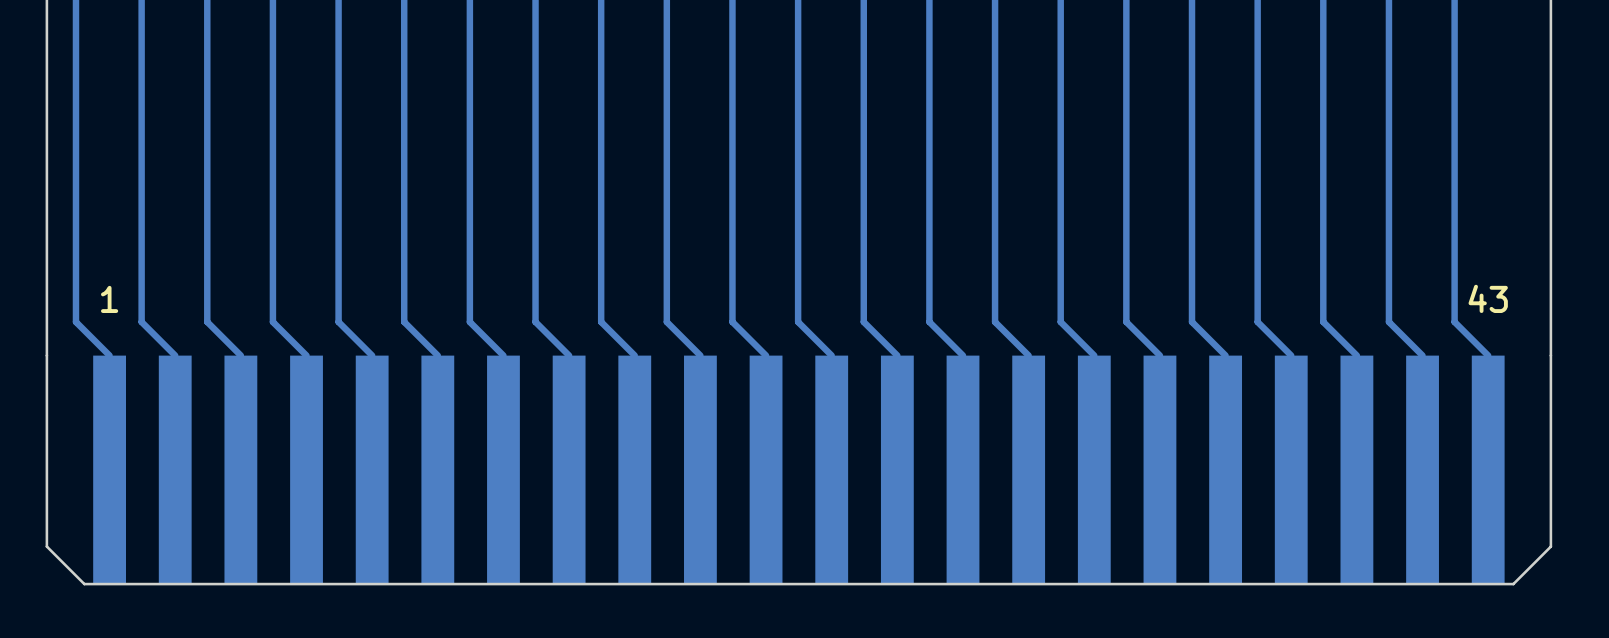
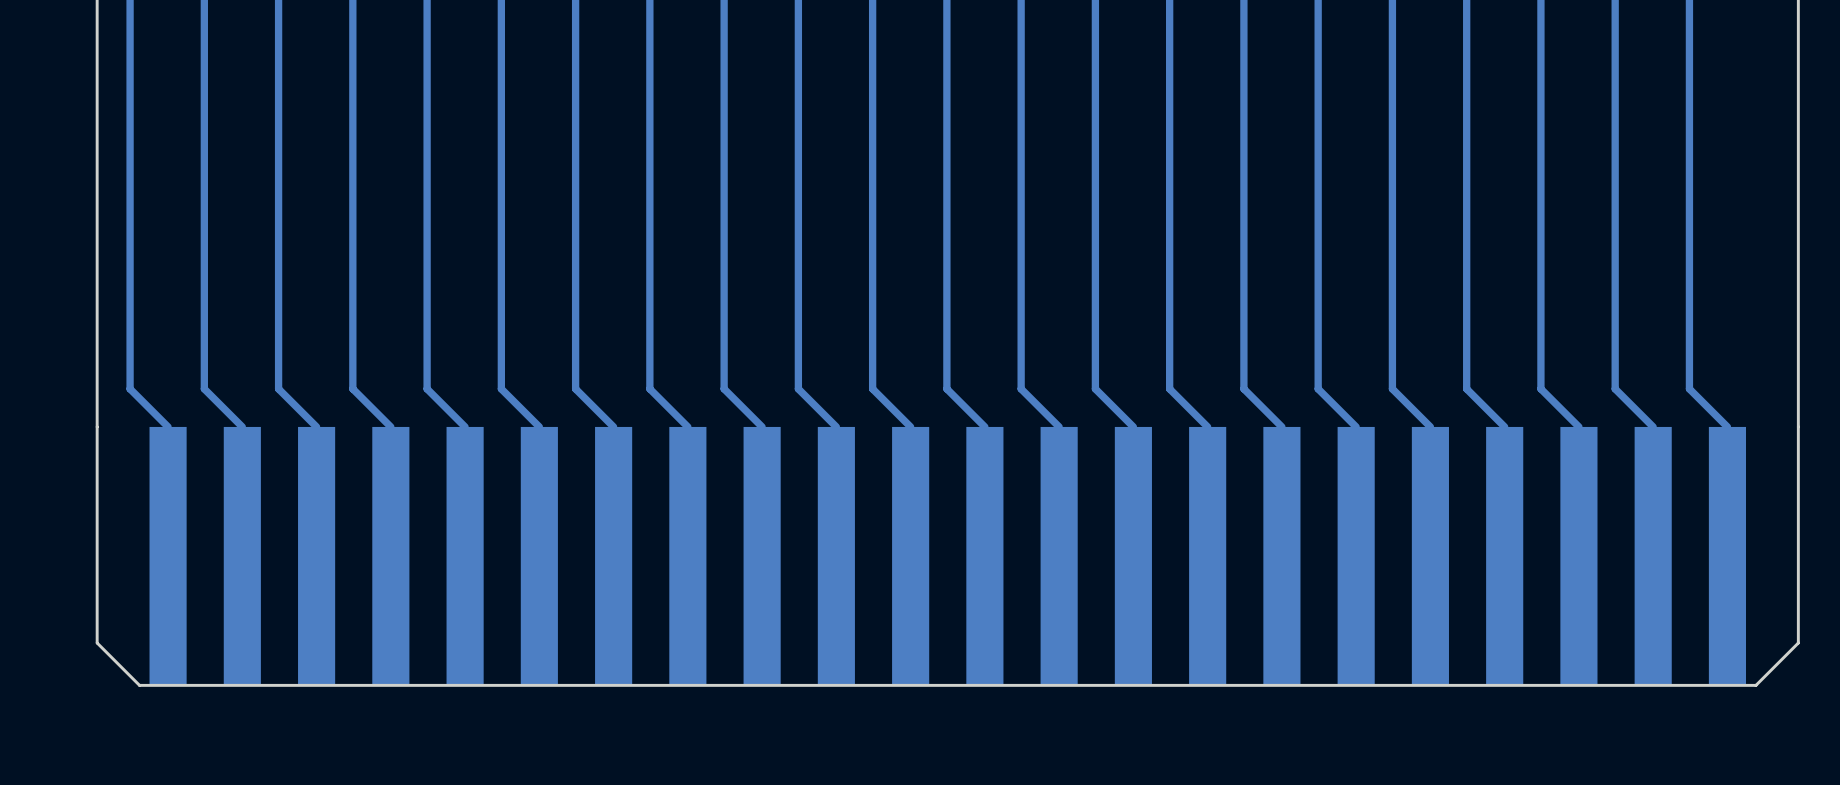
text: 43 (1488, 298) -> none
text: 1 (109, 299) -> none

